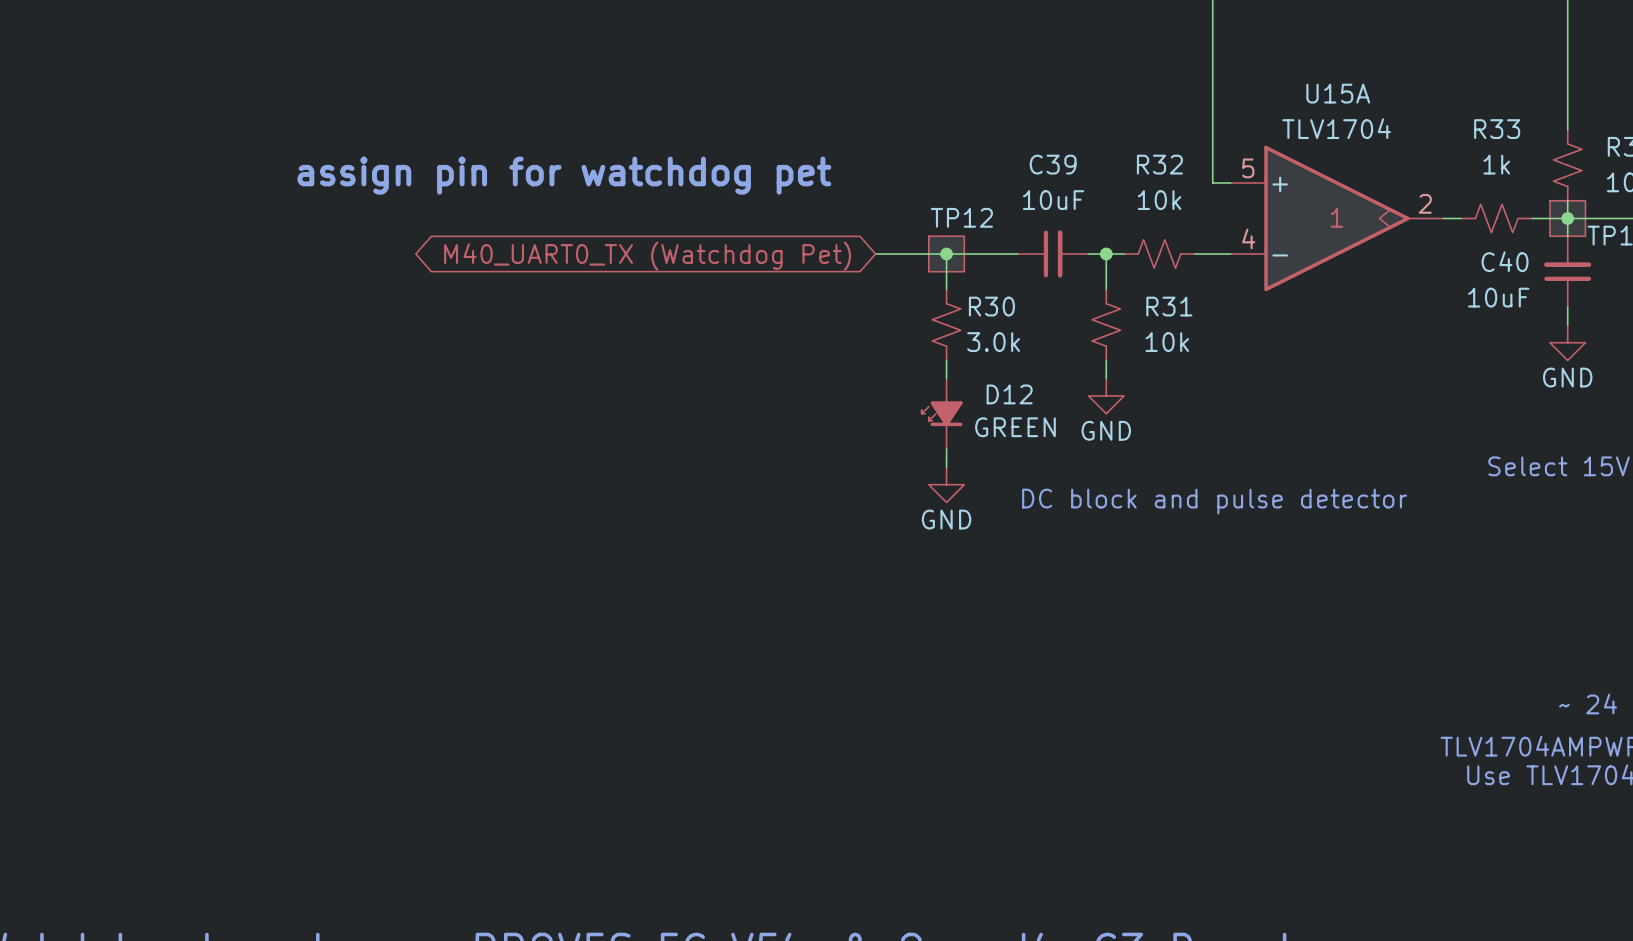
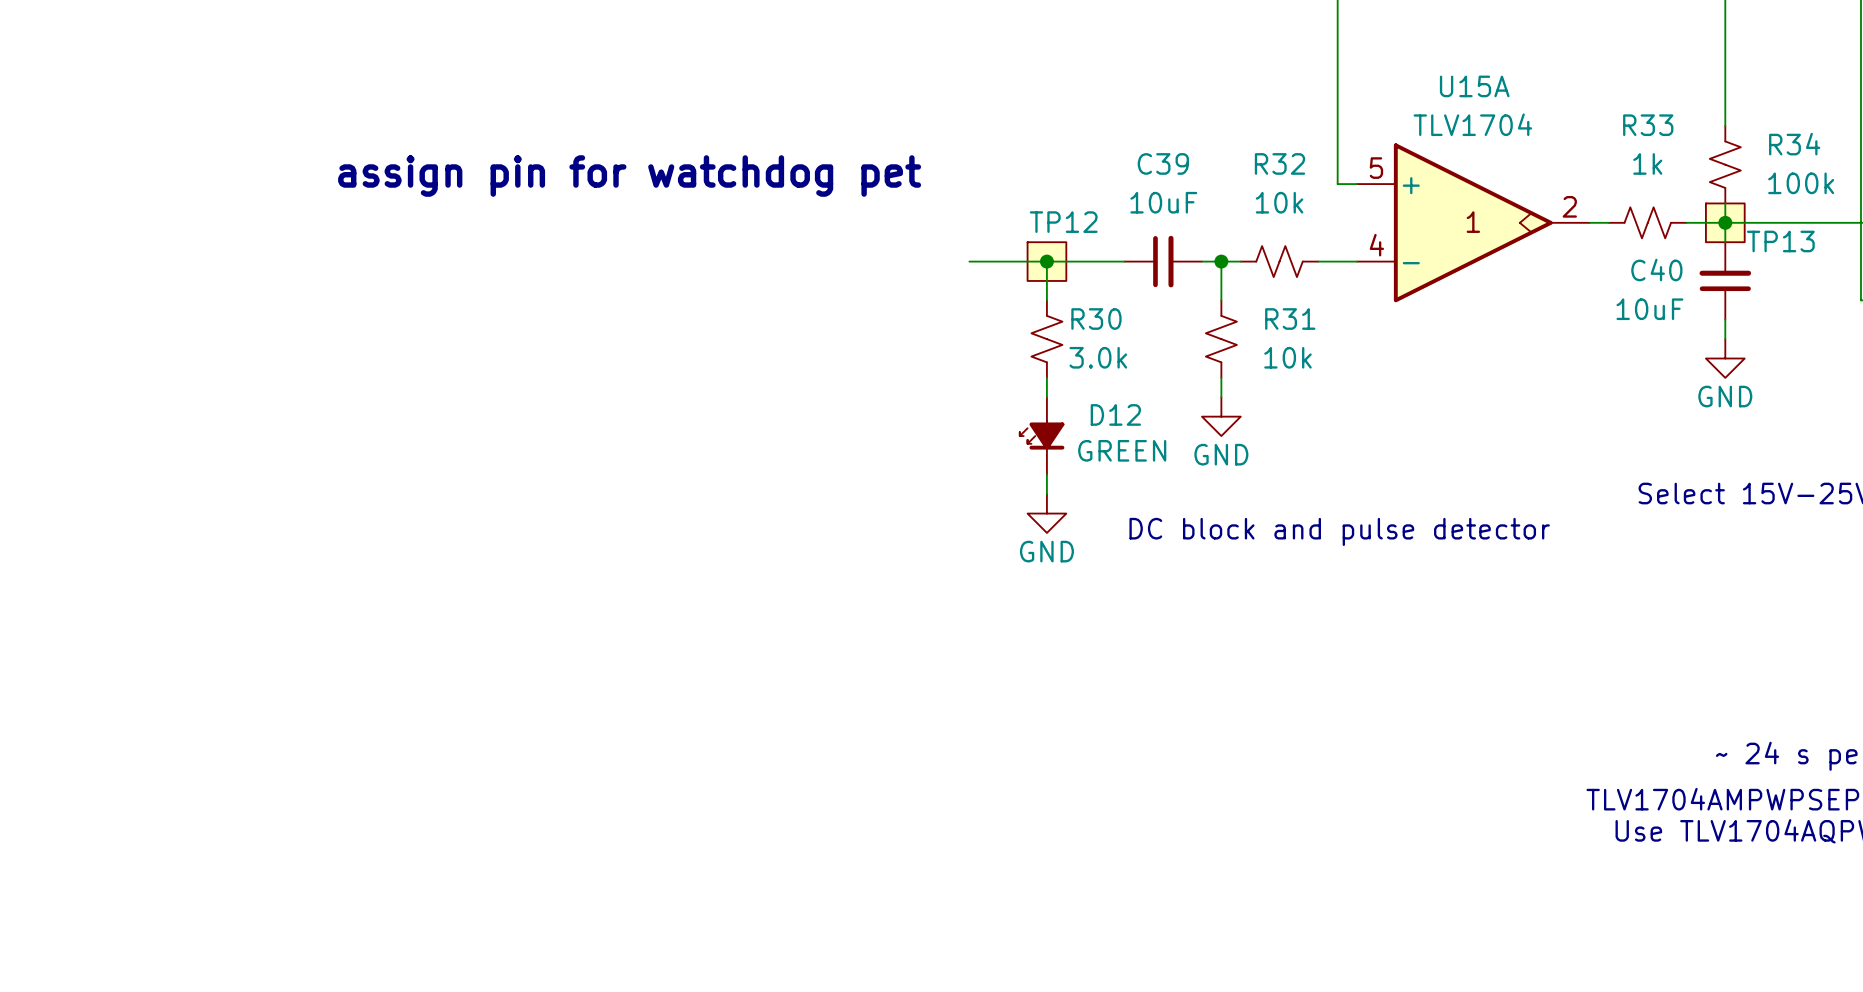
global label: M40_UART0_TX (Watchdog Pet) (647, 256) -> none

